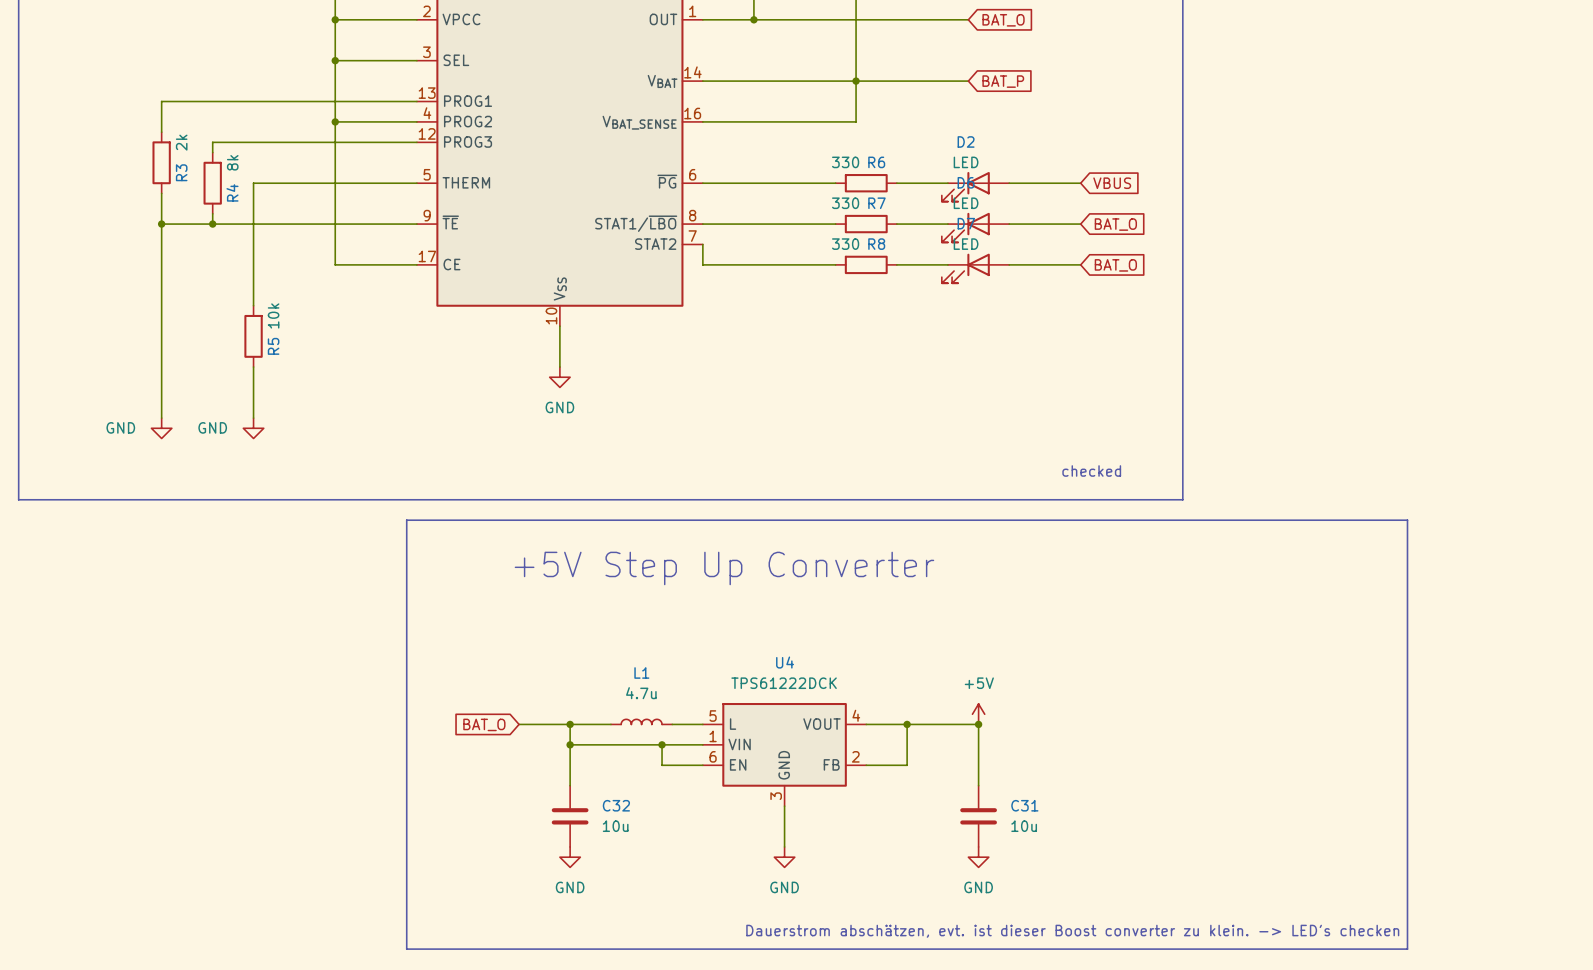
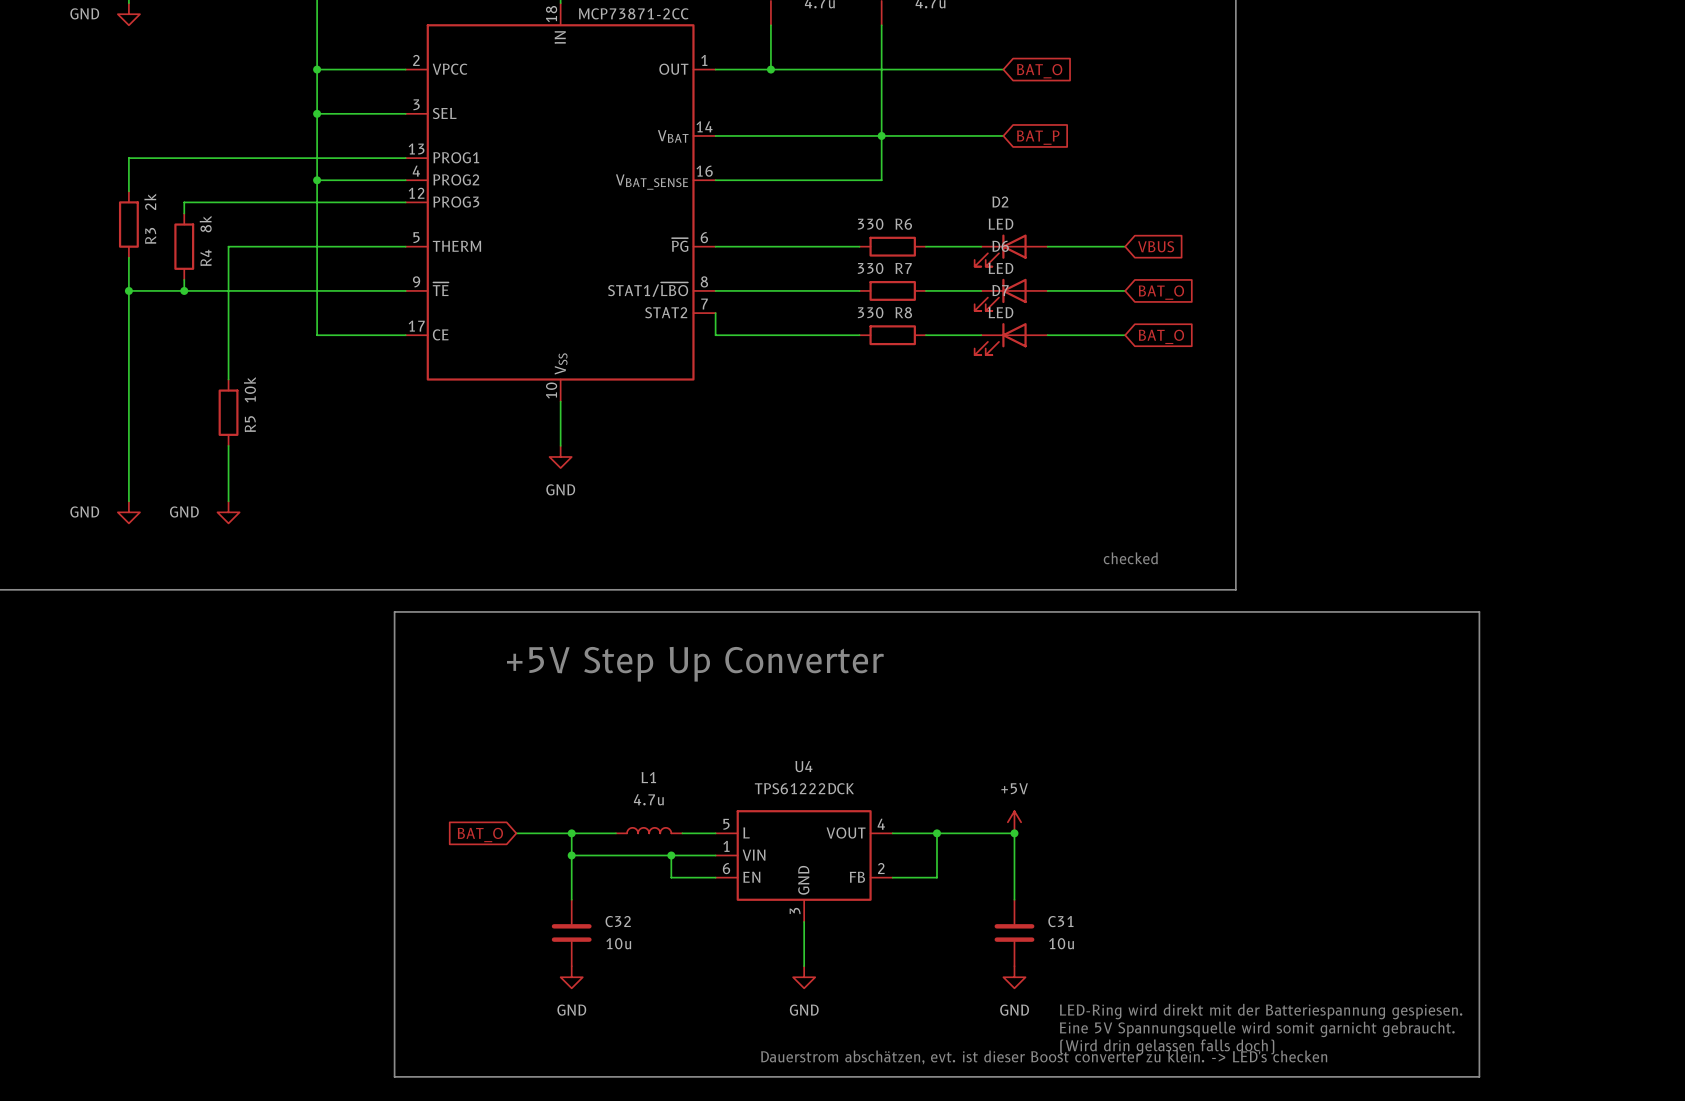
text: none -> LED-Ring wird direkt mit der Batteriespannung gespiesen. (1261, 1011)
text: none -> Eine 5V Spannungsquelle wird somit garnicht gebraucht. (1257, 1029)
text: none -> (Wird drin gelassen falls doch) (1167, 1047)

